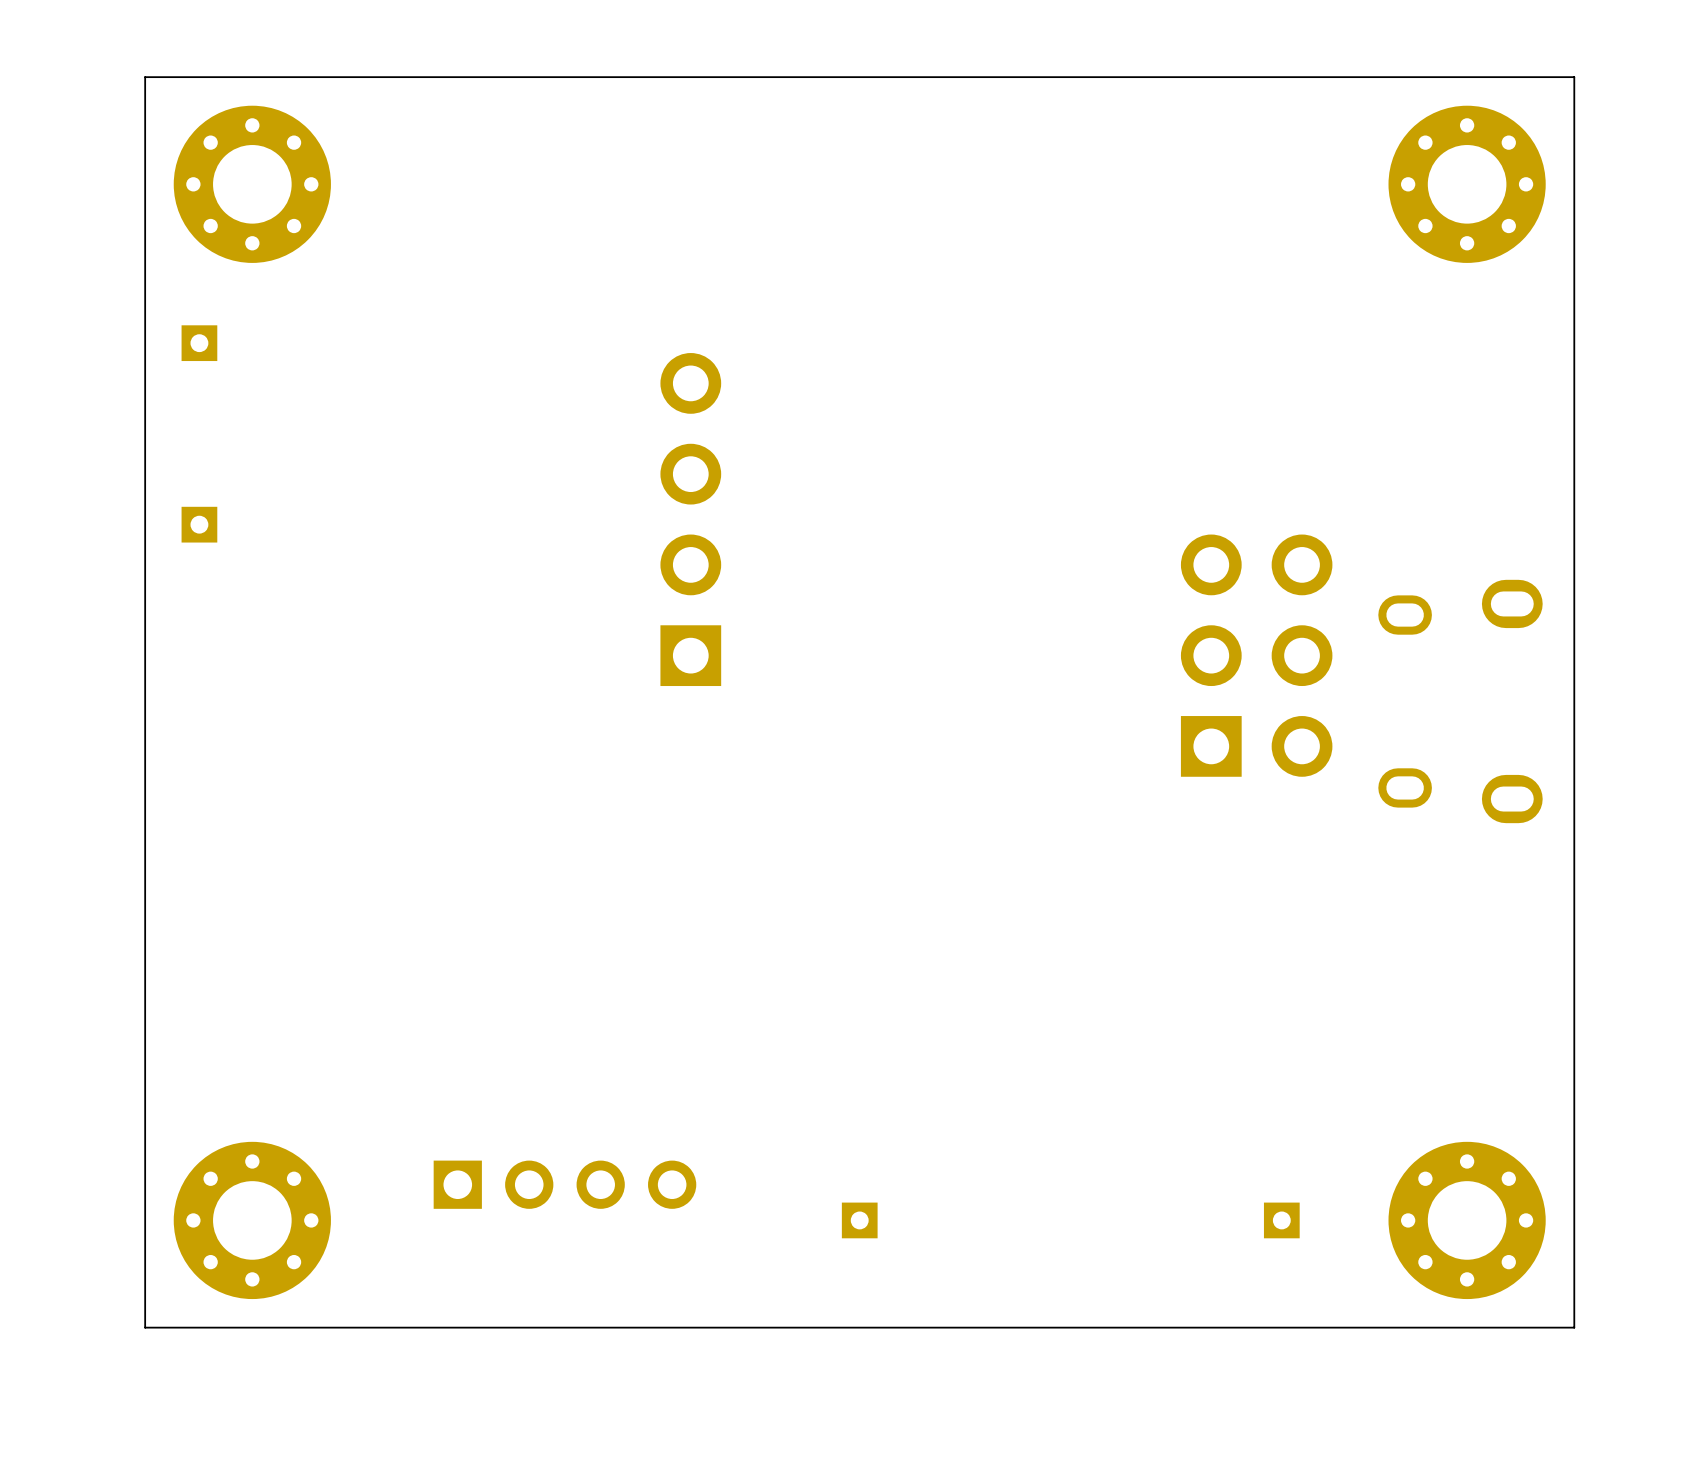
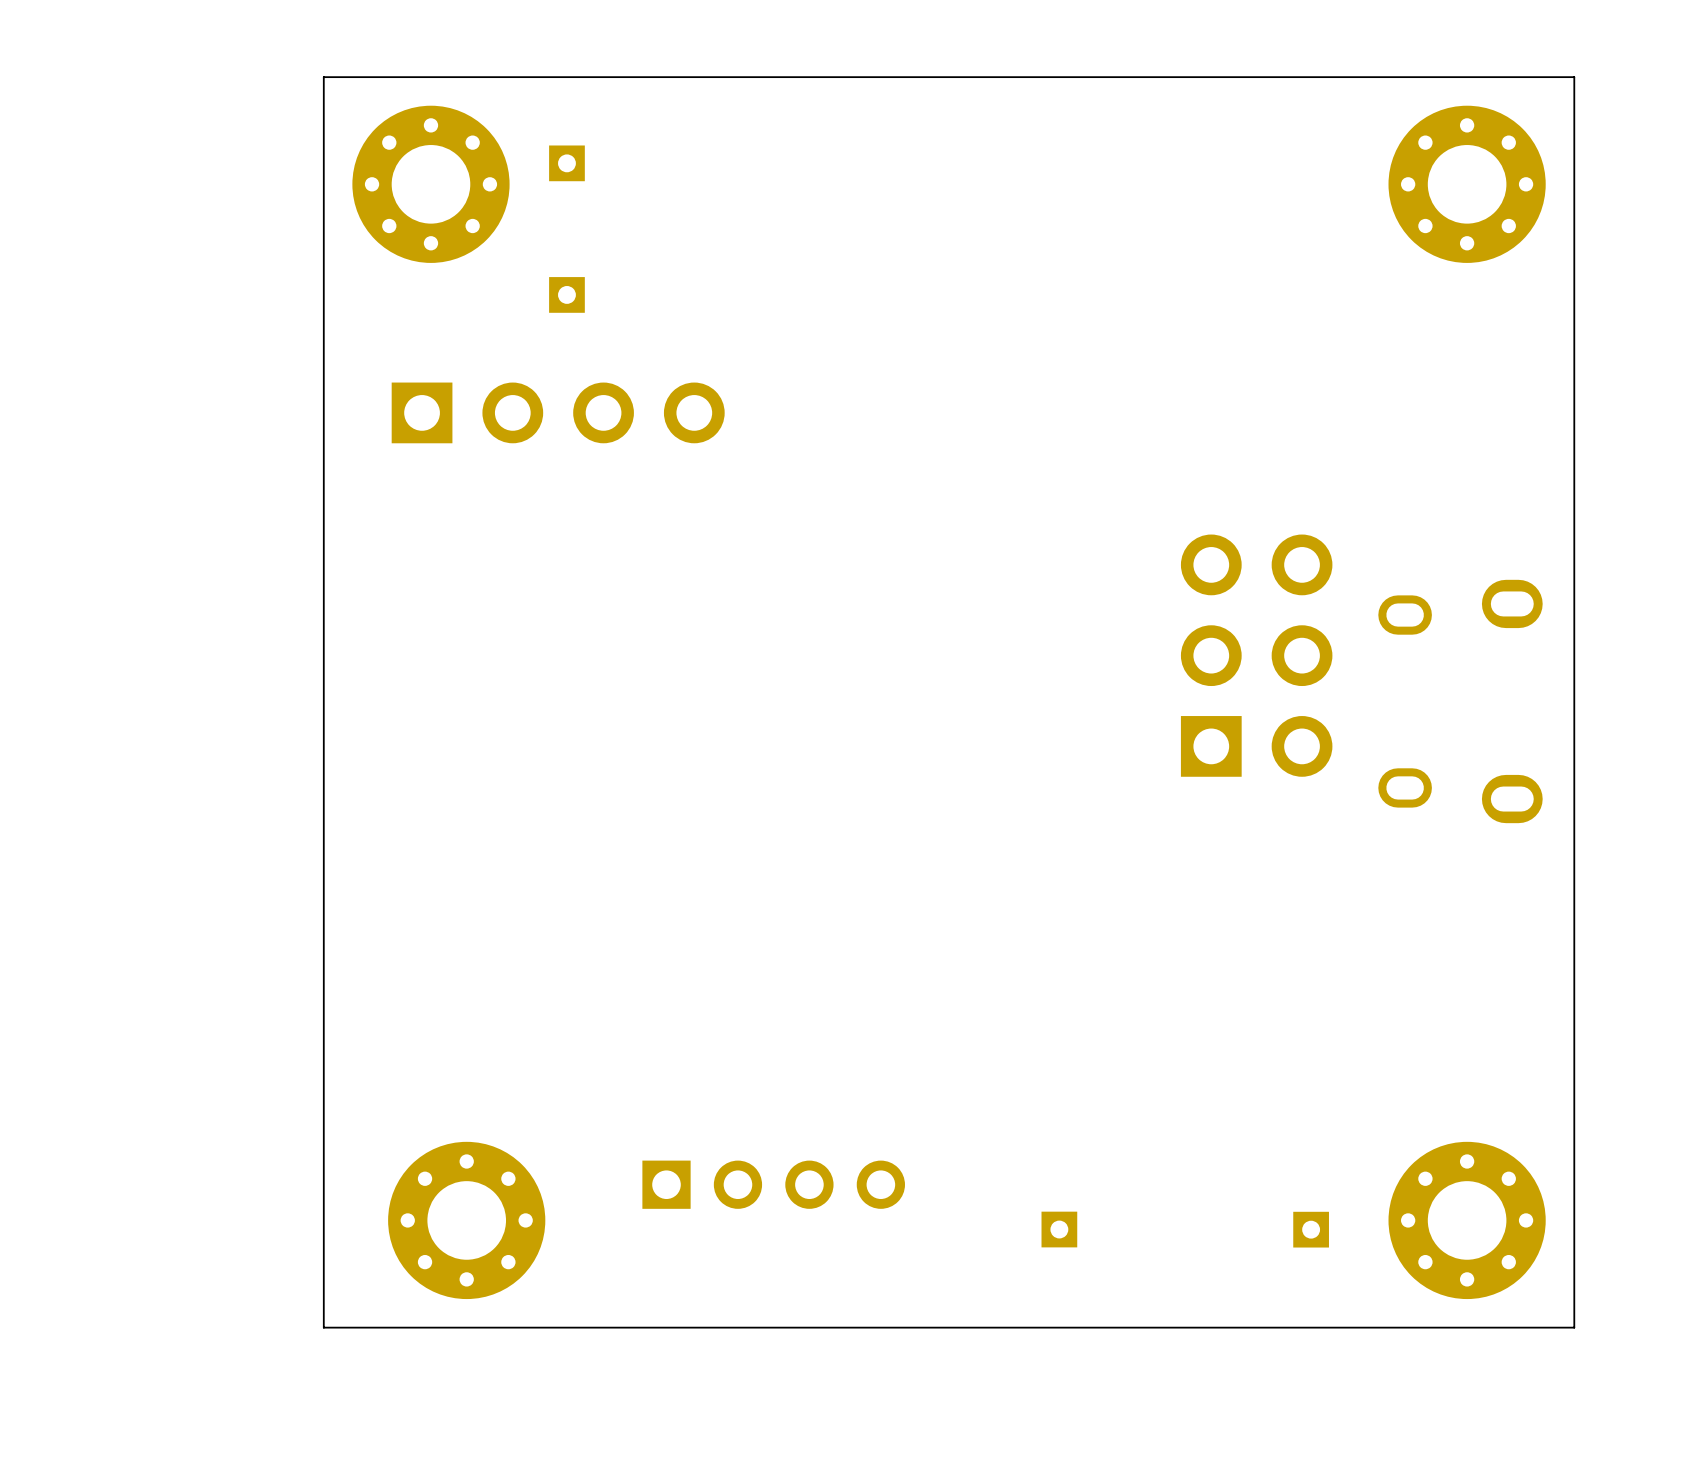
board edge: (323, 77) (145, 77) (145, 1327) (323, 1327) -> (323, 77) (323, 1327)
part: none -> (566, 163)
part position: (252, 184) -> (430, 184)
part: none -> (566, 294)
part: (199, 343) -> none
part rotation: 0° (690, 519) -> 90° clockwise (558, 412)
part: (199, 524) -> none
part position: (564, 1184) -> (773, 1184)
part position: (252, 1220) -> (466, 1220)
part position: (859, 1220) -> (1059, 1229)
part position: (1281, 1220) -> (1311, 1229)

